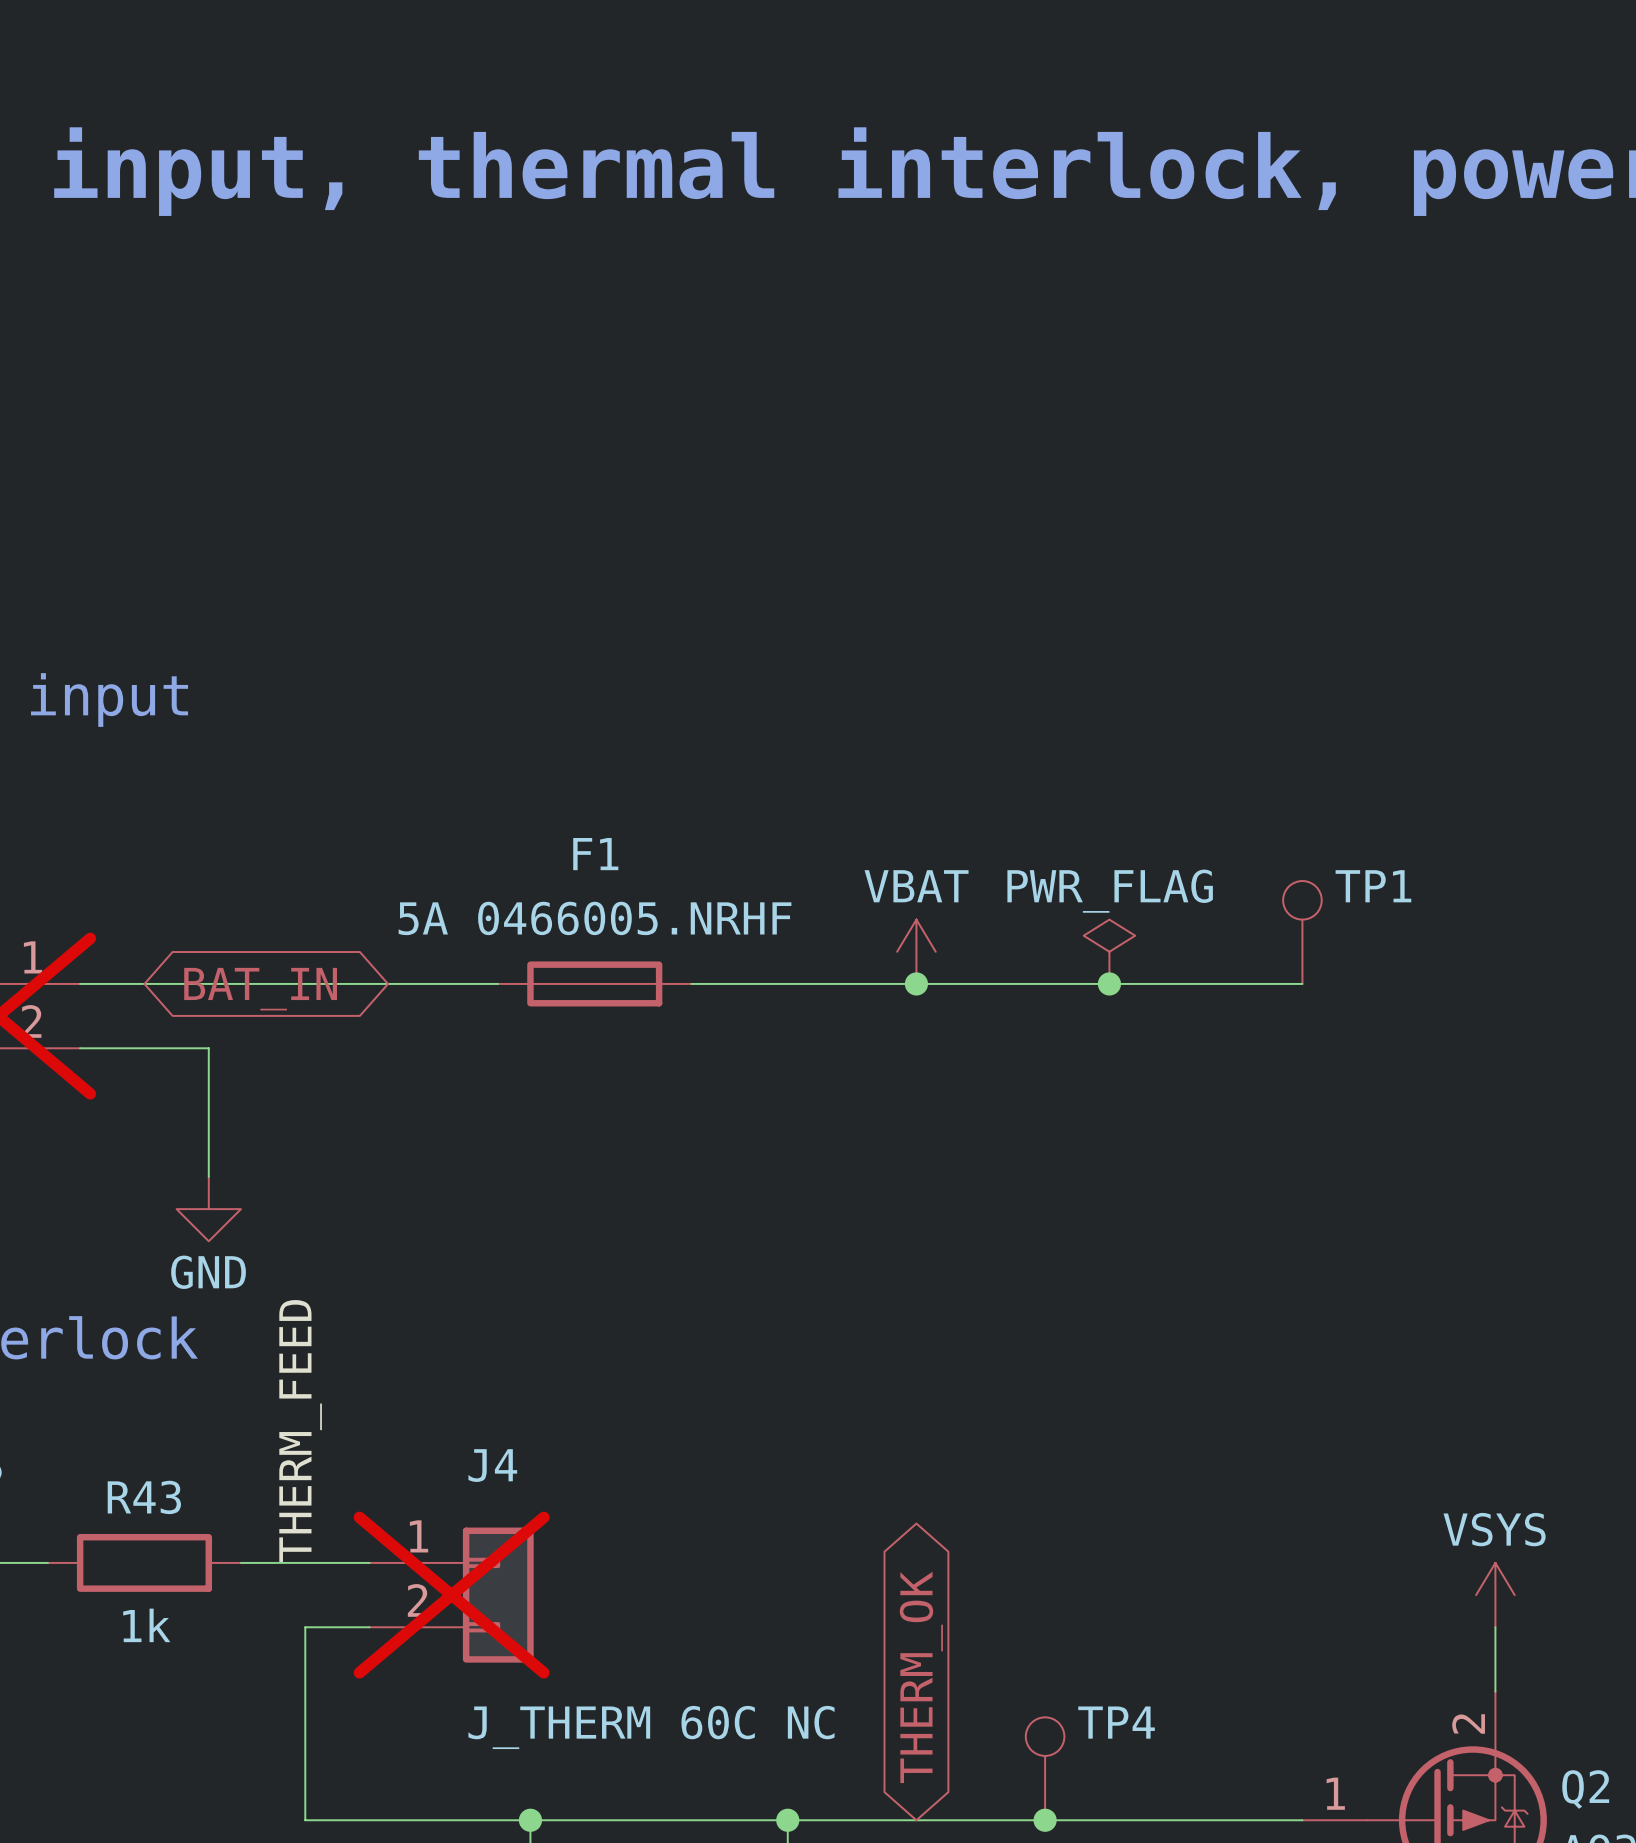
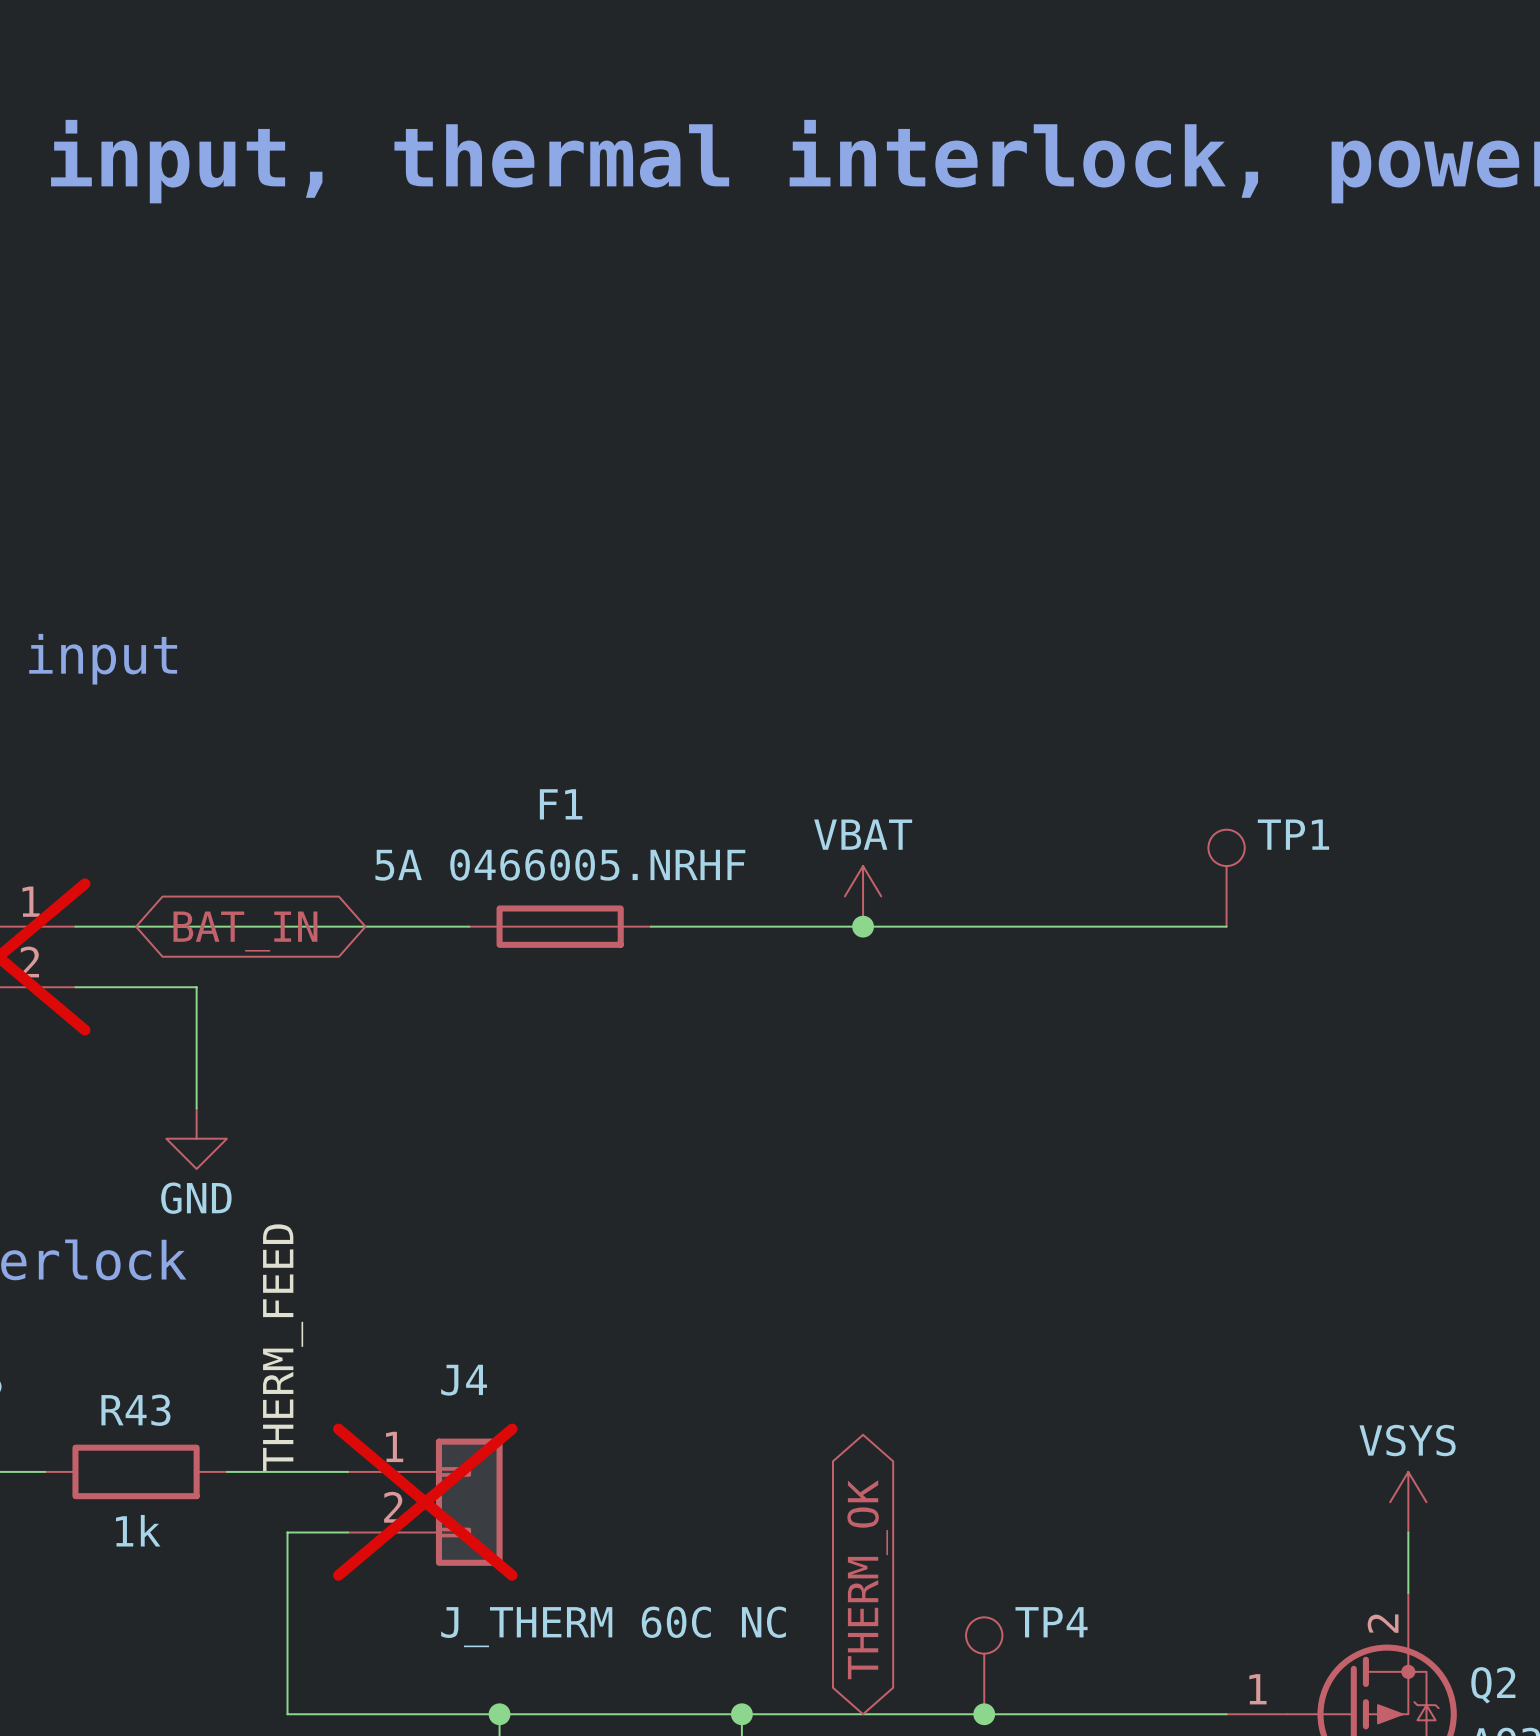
power symbol: PWR_FLAG (1109, 951) -> none
junction: (1109, 983) -> none

